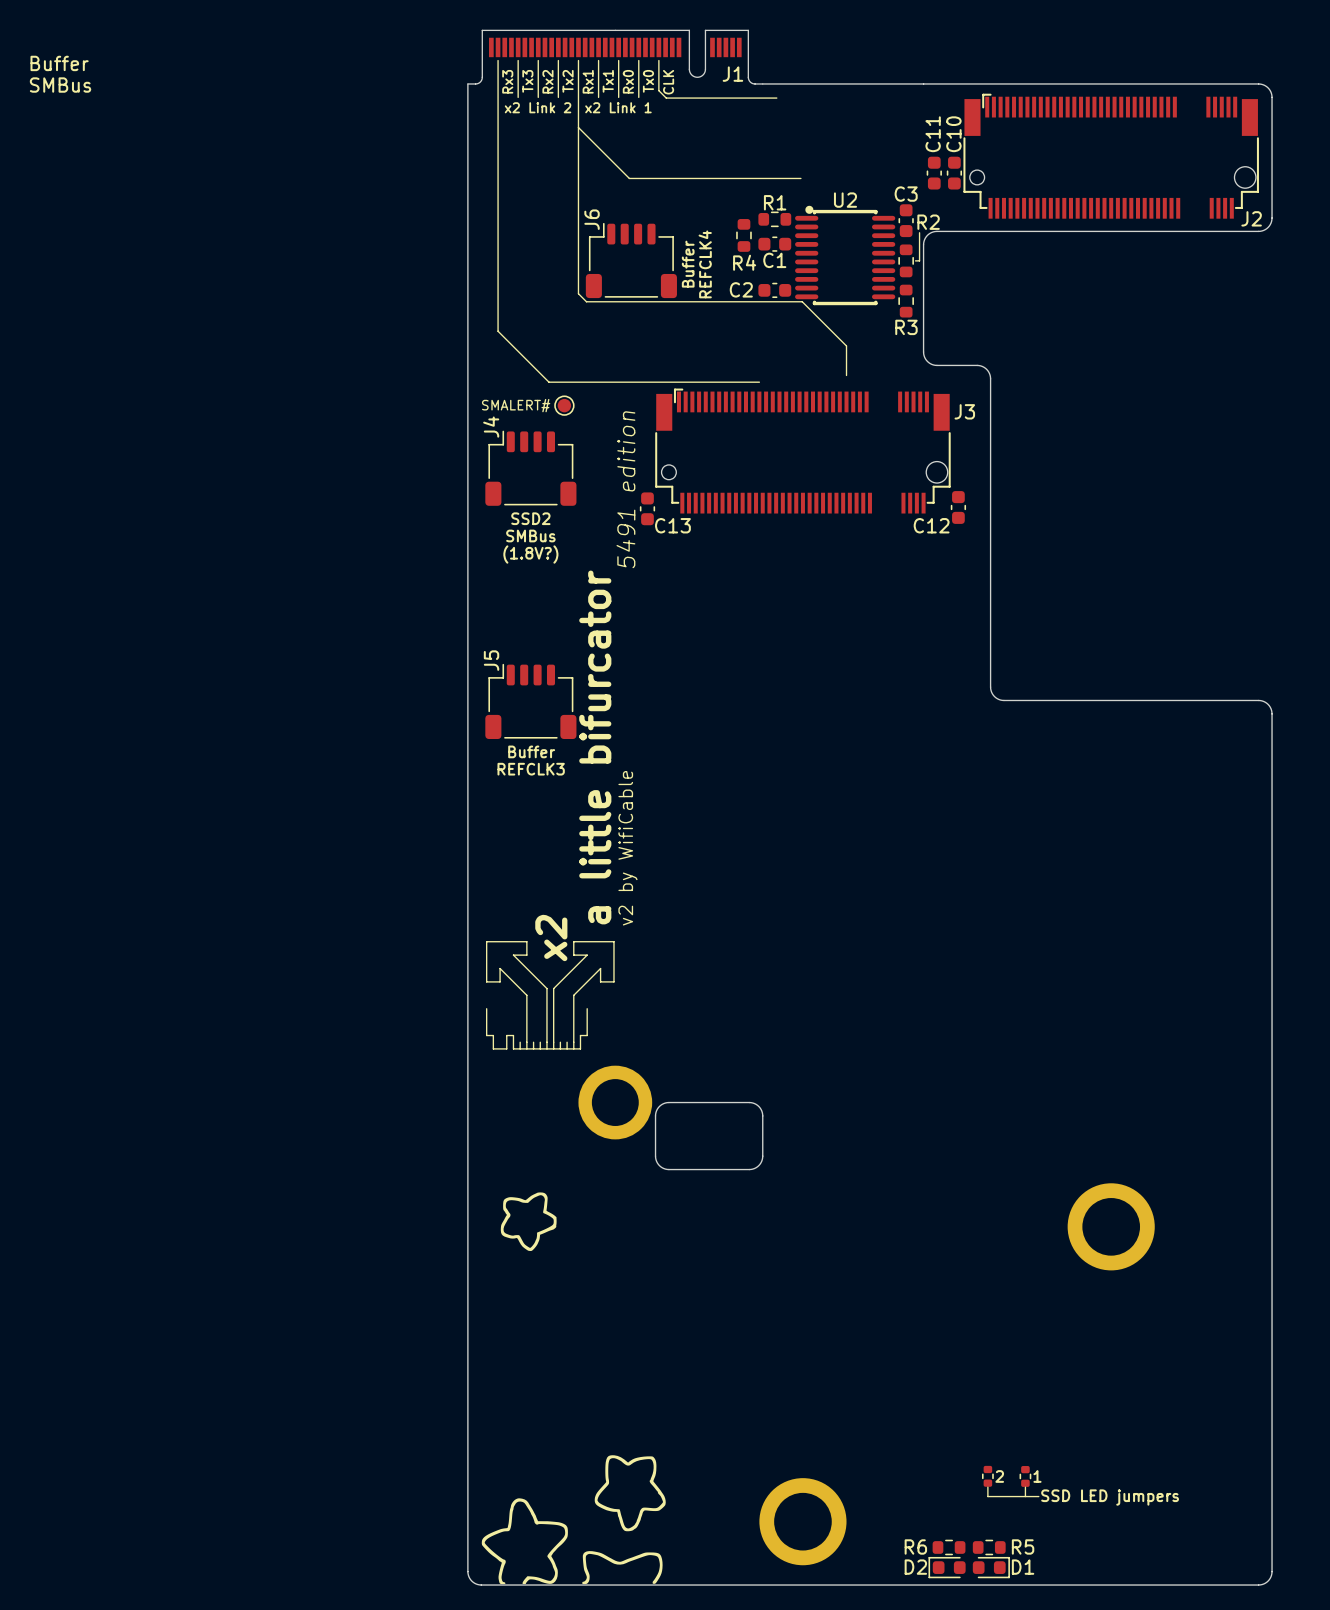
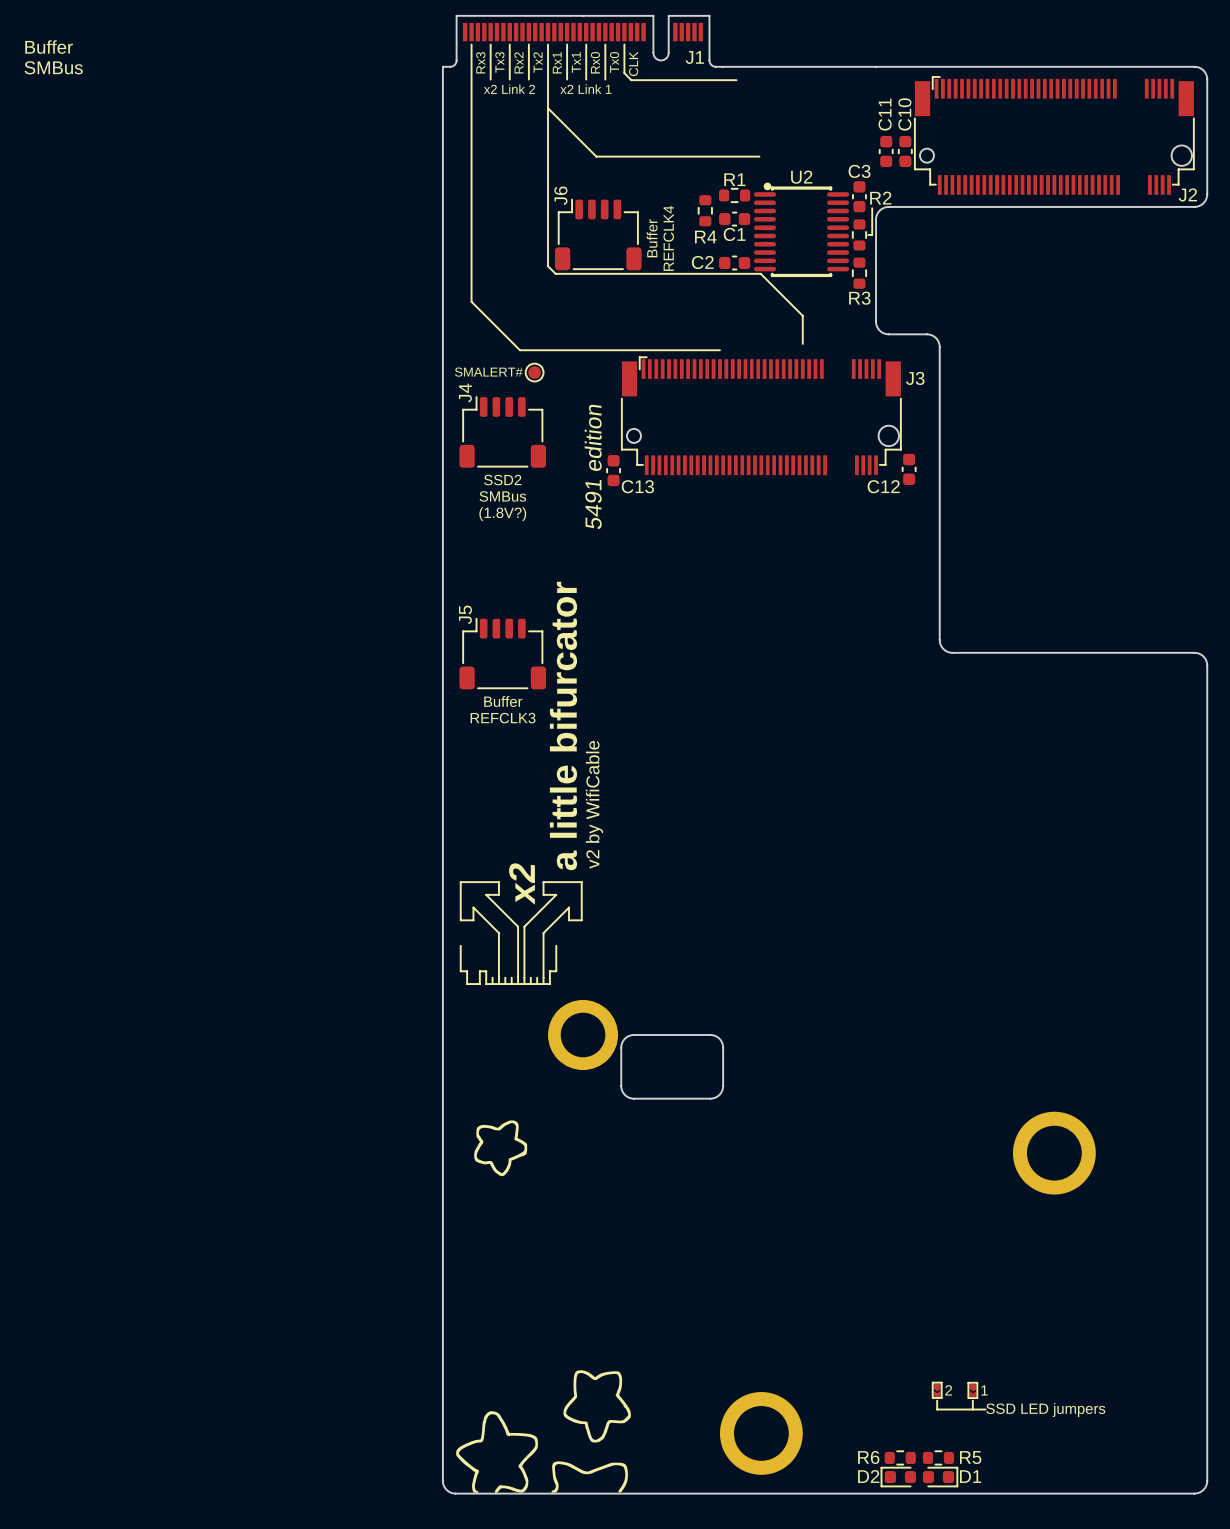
part footprint: [982, 1465, 994, 1487] -> [931, 1381, 943, 1399]
part footprint: [1019, 1466, 1032, 1487] -> [967, 1382, 979, 1399]

